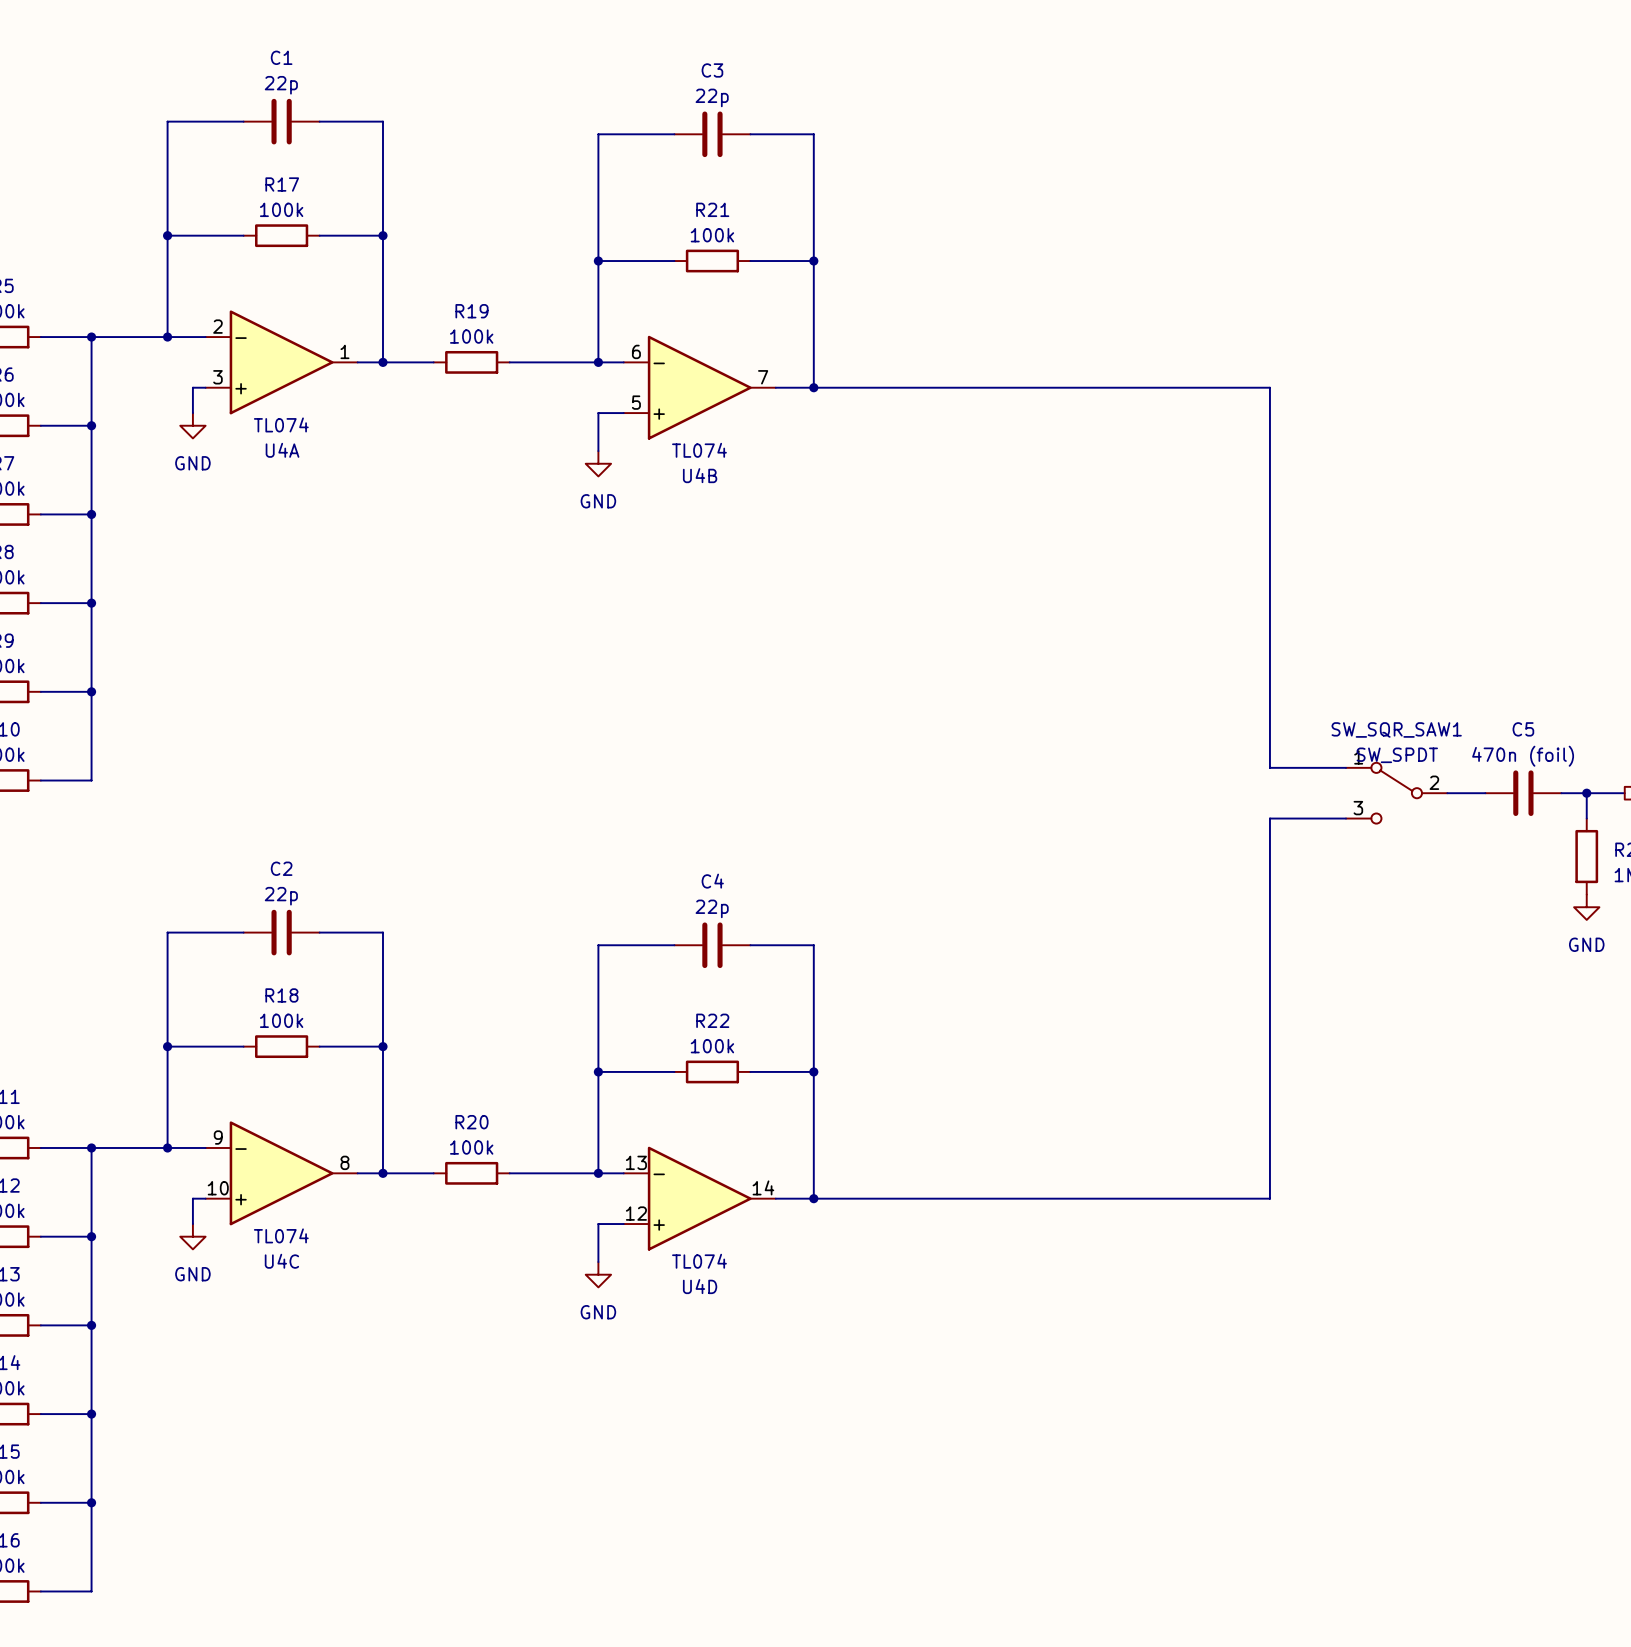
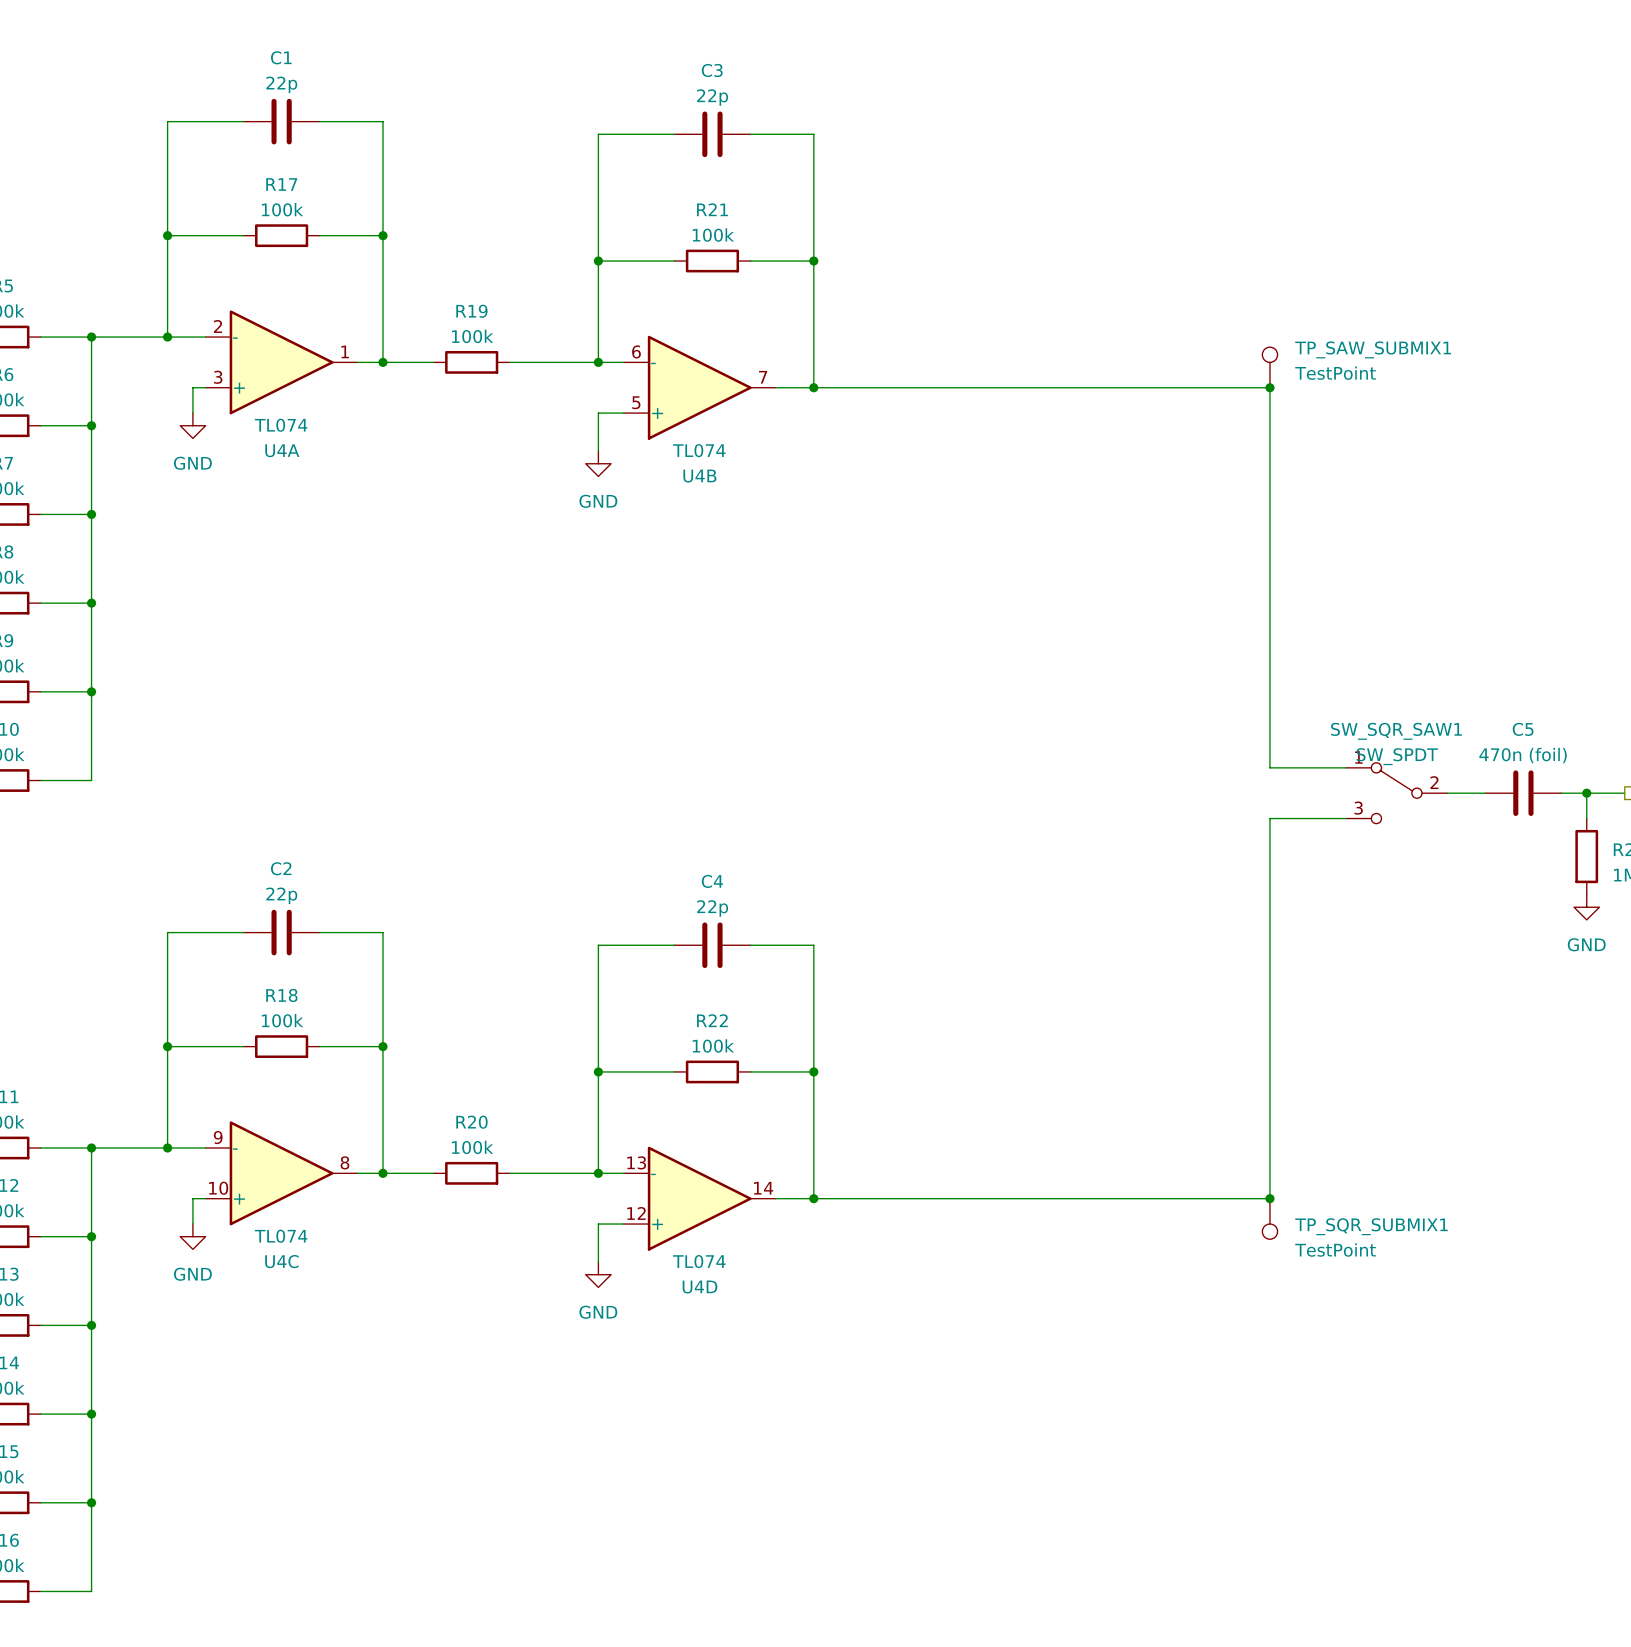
TP_SAW_SUBMIX1: none -> TestPoint (1269, 367)
junction: none -> (1269, 387)
junction: none -> (1269, 1198)
TP_SQR_SUBMIX1: none -> TestPoint (1269, 1218)

